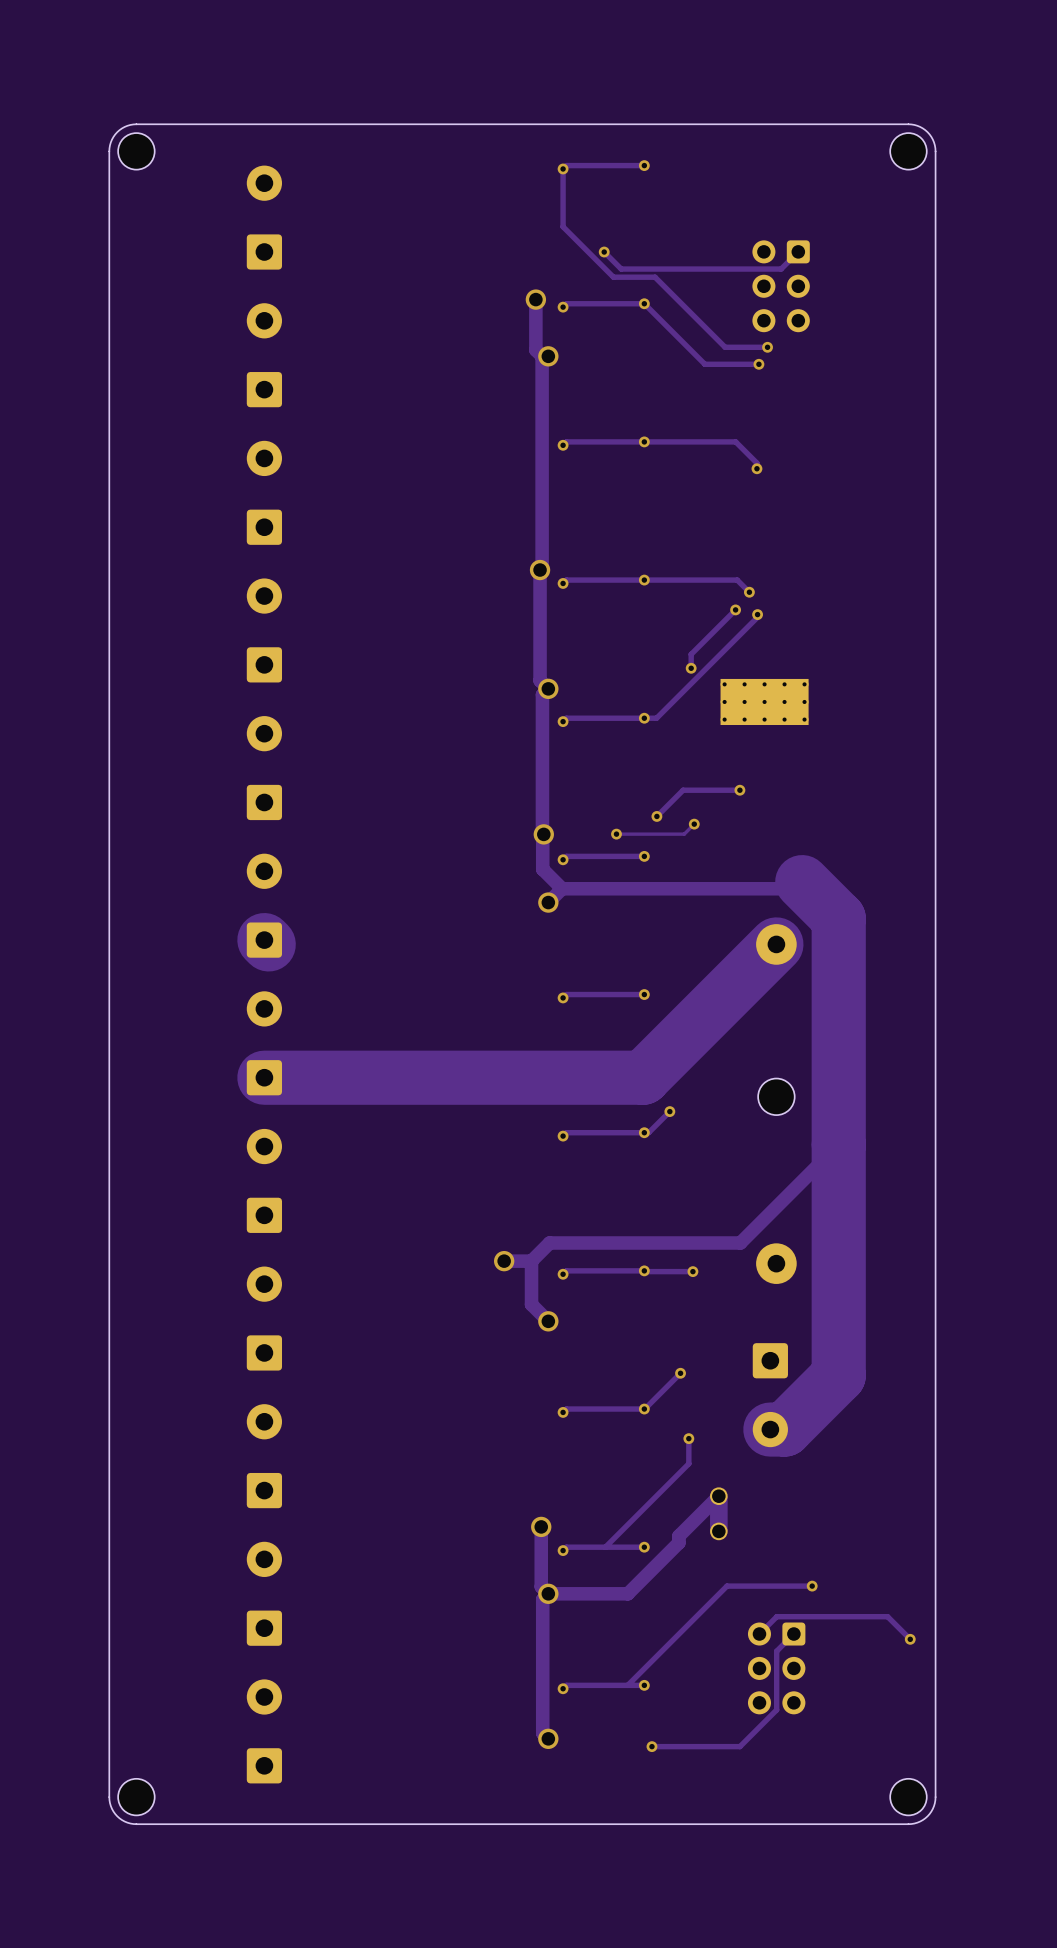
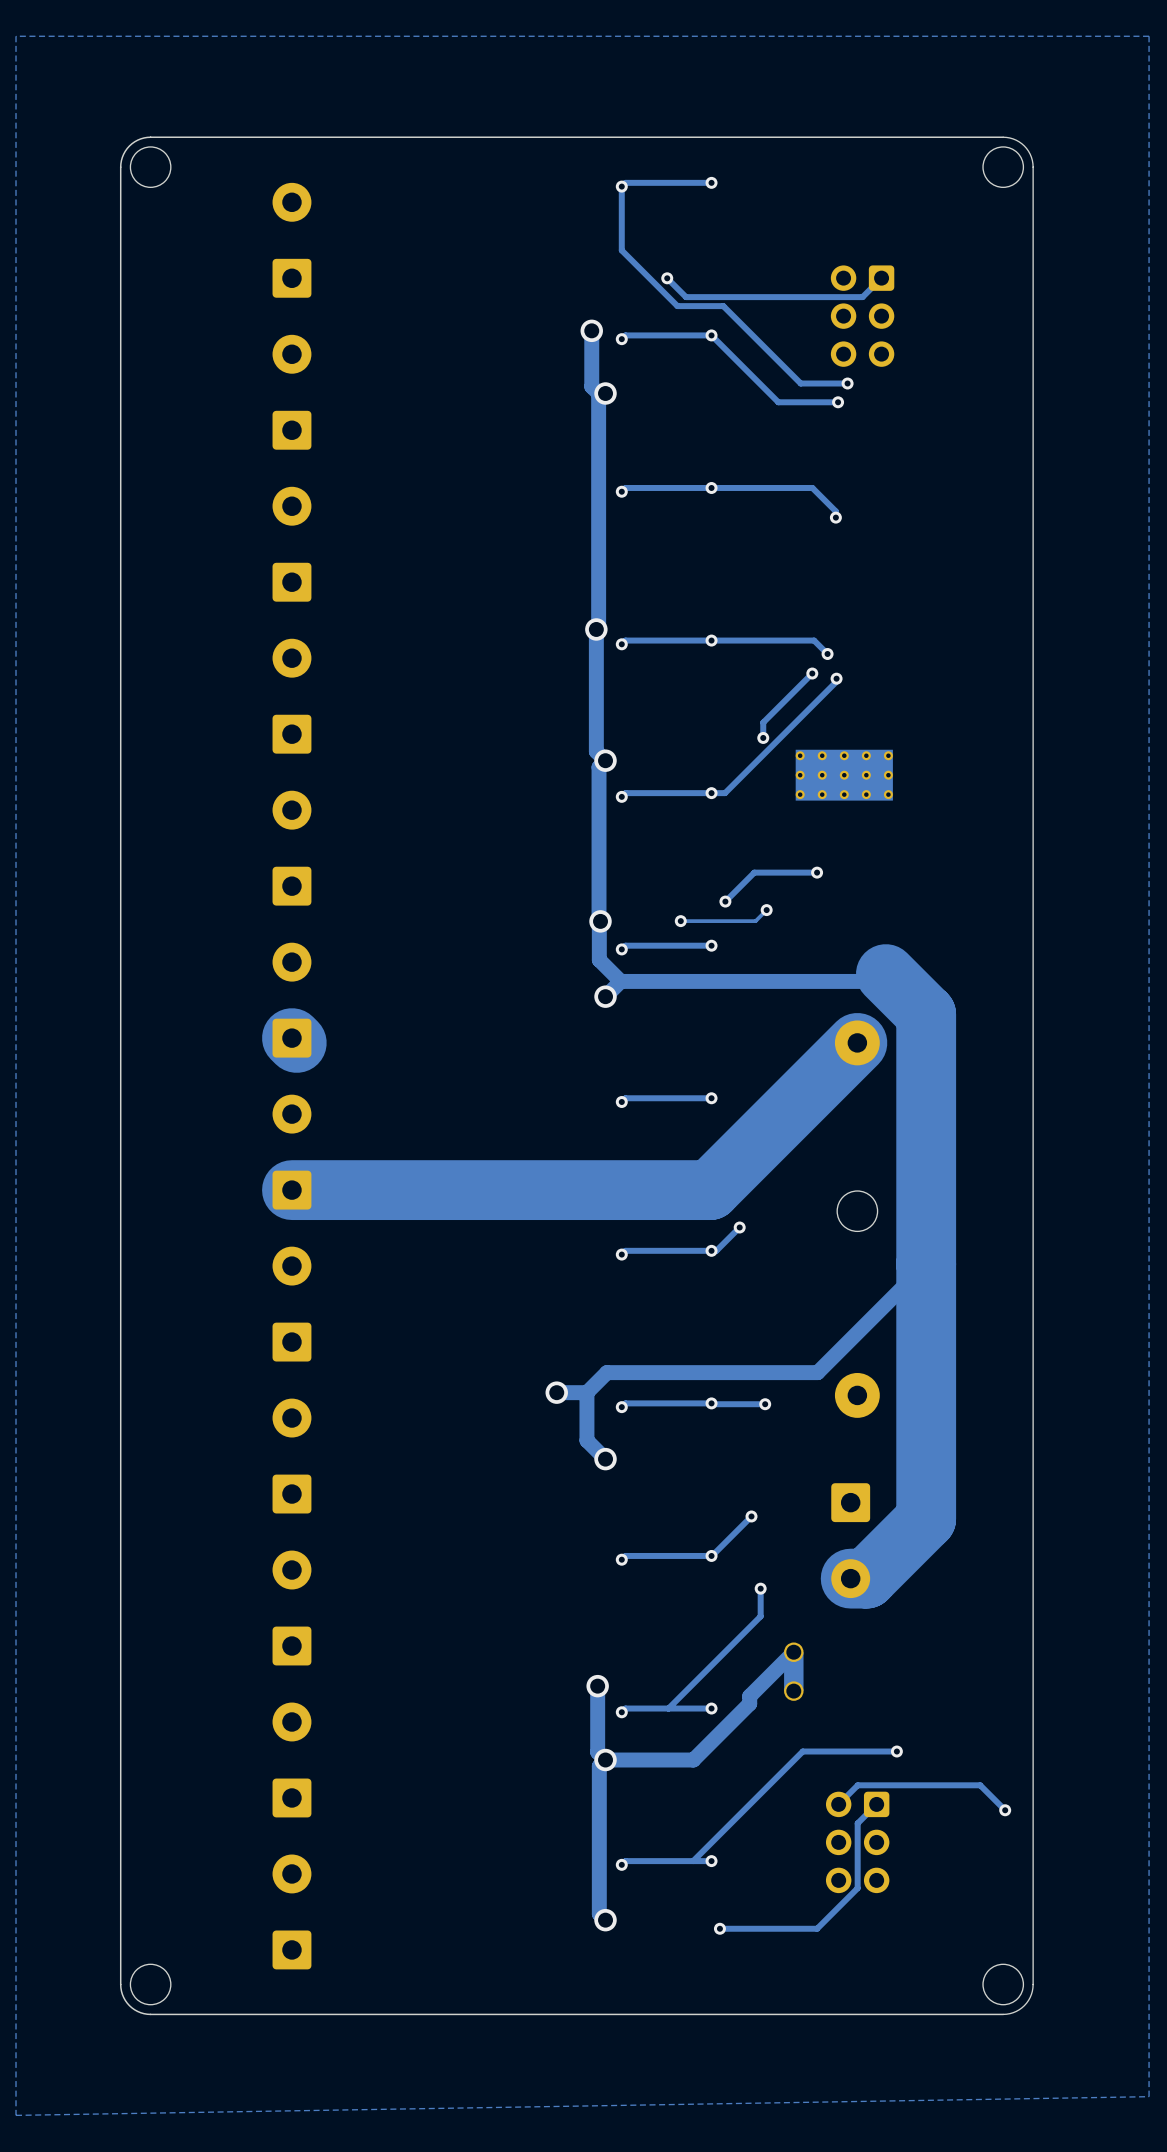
zone outline: none -> (1149, 36) (16, 36) (16, 2115) (1149, 2096) (1149, 36)

